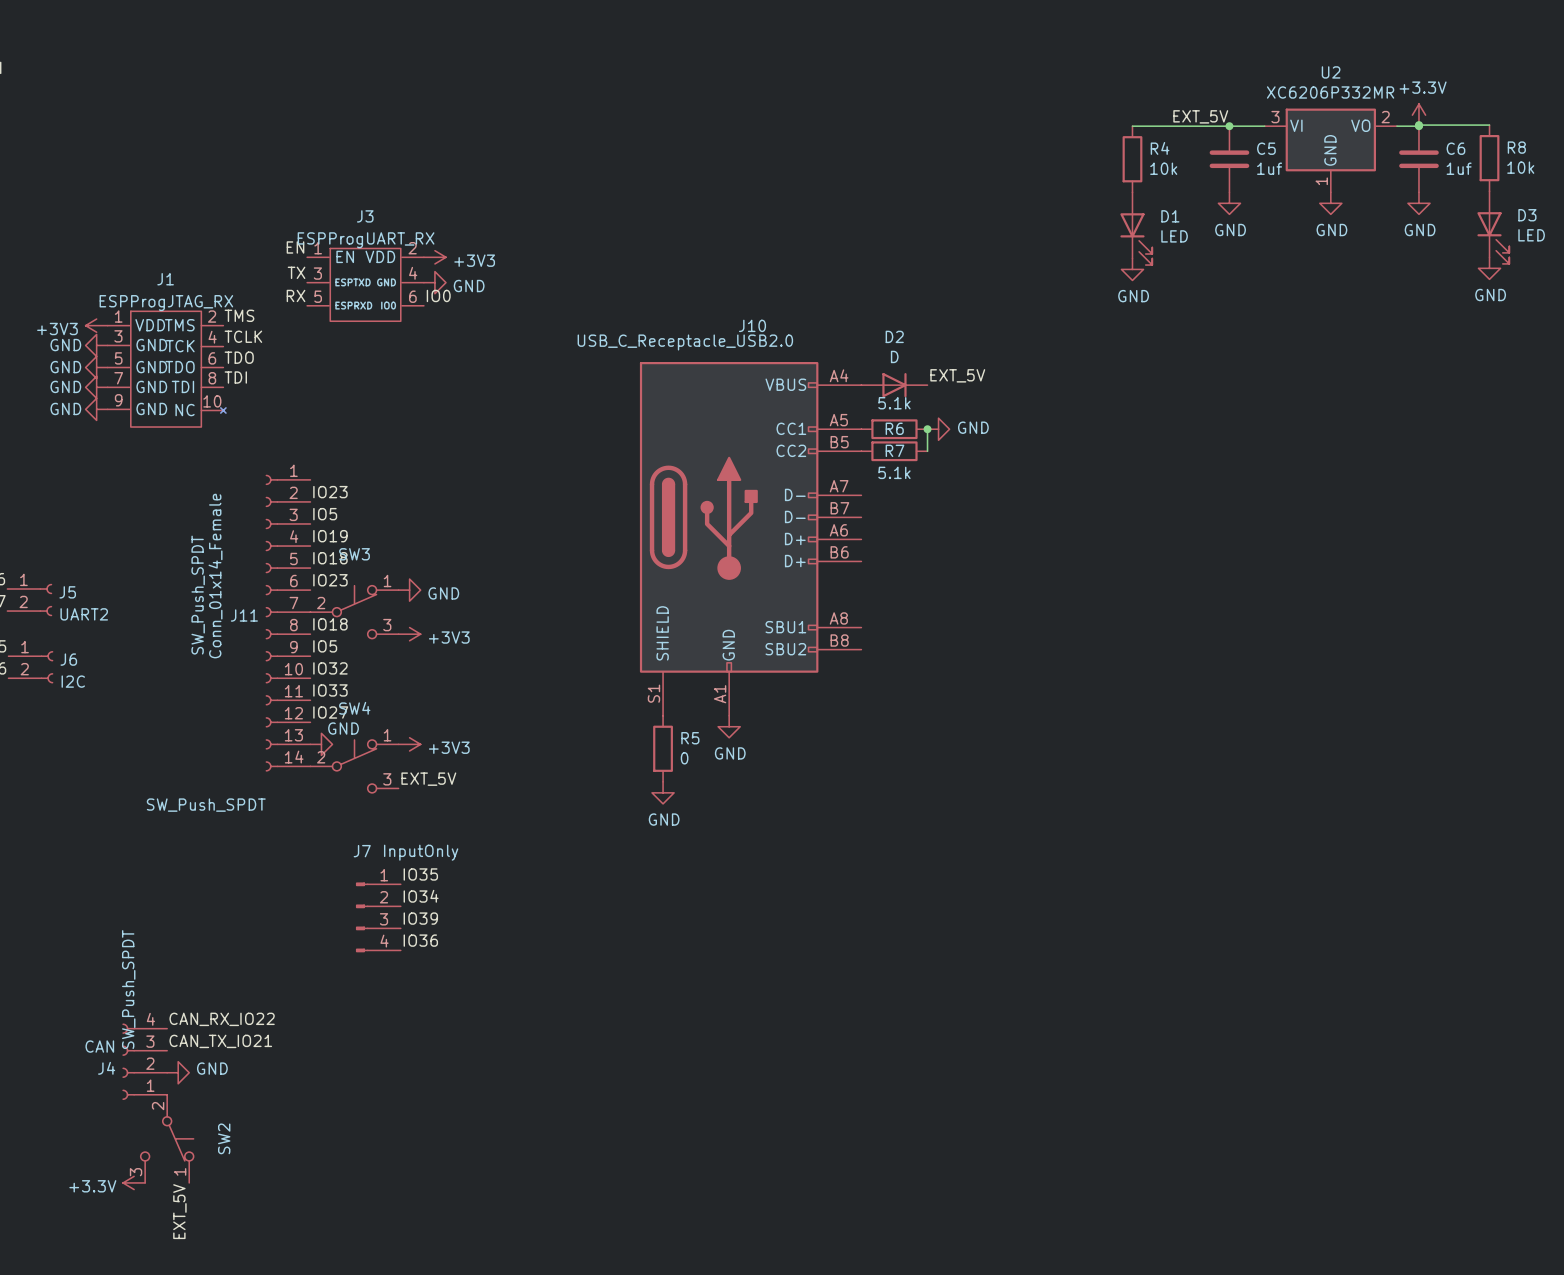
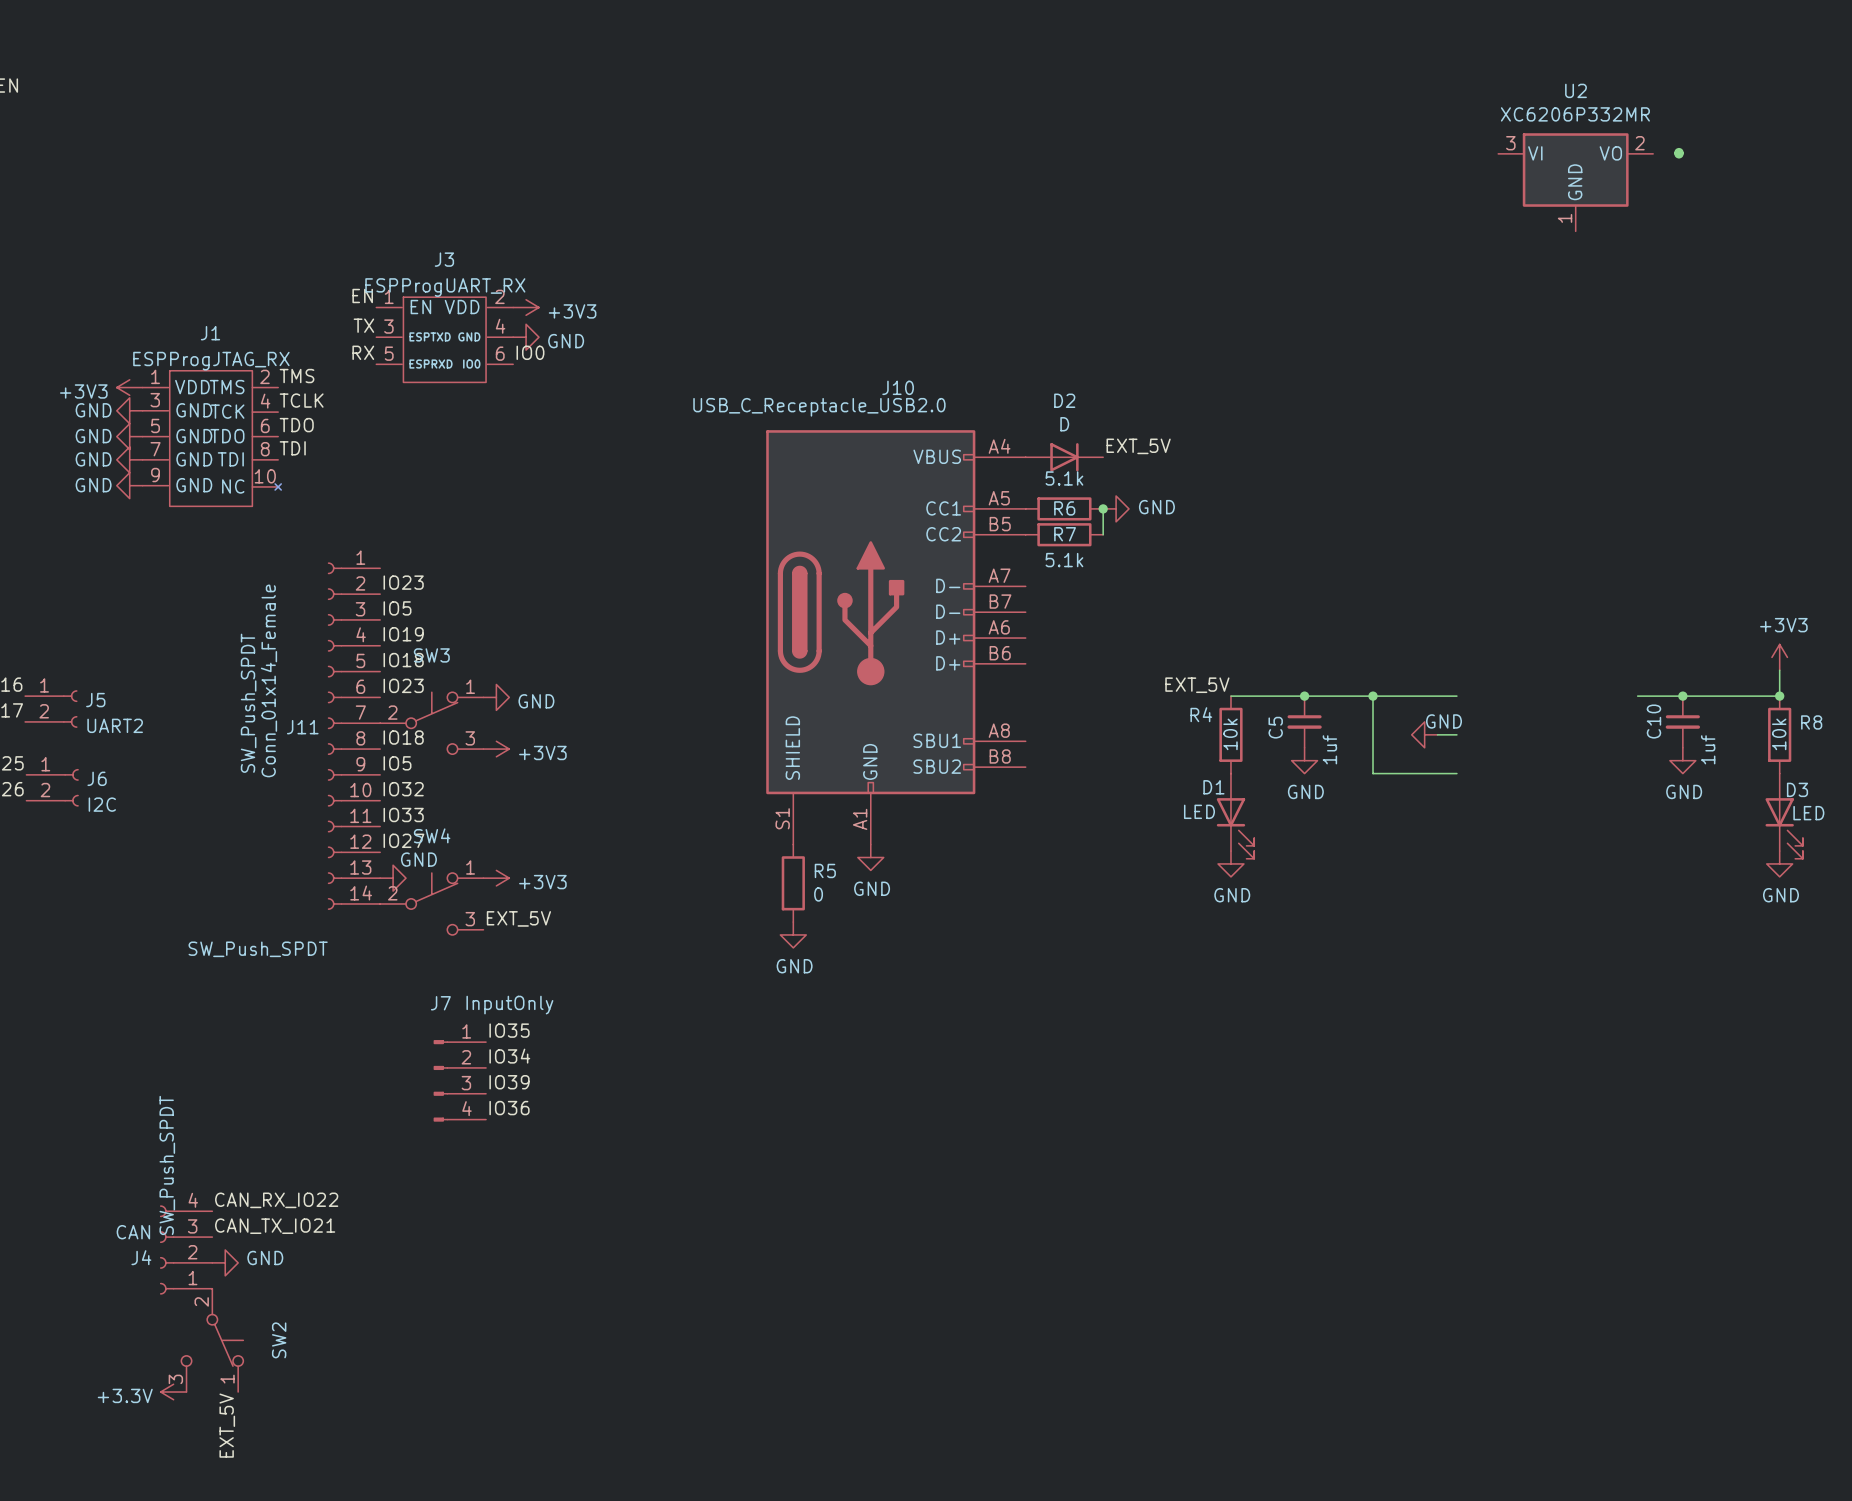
power symbol: +3.3V (1418, 115) -> none
label: EXT_5V (1200, 116) -> none
wire: (1489, 125) (1396, 126) -> none
wire: (1132, 126) (1264, 126) -> none
C5 symbol: [1209, 126, 1250, 193] -> [1287, 696, 1322, 748]
junction: (1229, 126) -> none
R4 name position: R4 (1160, 148) -> R4 (1201, 714)
C5 name position: C5 (1266, 148) -> C5 (1275, 727)
R8 position: (1489, 158) -> (1779, 734)
R4 position: (1132, 159) -> (1230, 734)
C6: 1uf (1418, 159) -> none
R8 value rotation: 0° (1520, 167) -> 90° counterclockwise (1779, 734)
R4 value rotation: 0° (1163, 168) -> 90° counterclockwise (1230, 734)
C5 value position: 1uf (1269, 168) -> 1uf (1329, 749)
power symbol: GND (1229, 203) -> none
power symbol: GND (1330, 203) -> none
power symbol: GND (1418, 203) -> none
D3 name position: D3 (1527, 215) -> D3 (1797, 789)
D1 name position: D1 (1170, 216) -> D1 (1213, 787)
D3 position: (1493, 227) -> (1784, 816)
D1 position: (1136, 228) -> (1235, 816)
D3 value position: LED (1531, 235) -> LED (1808, 813)
D1 value position: LED (1174, 236) -> LED (1199, 811)
power symbol: GND (1489, 268) -> none
power symbol: GND (1132, 269) -> none
power symbol: none -> +3V3 (1779, 657)
wire: none -> (1779, 670) (1779, 696) (1637, 696)
label: none -> EXT_5V (1197, 685)
wire: none -> (1230, 696) (1456, 696)
junction: none -> (1304, 696)
wire: none -> (1373, 696) (1373, 773) (1456, 773)
junction: none -> (1373, 696)
junction: none -> (1682, 696)
junction: none -> (1779, 696)
C10: none -> 1uf (1682, 721)
power symbol: none -> GND (1424, 734)
wire: none -> (1437, 734) (1456, 734)
power symbol: none -> GND (1304, 760)
power symbol: none -> GND (1682, 760)
power symbol: none -> GND (1230, 863)
power symbol: none -> GND (1779, 863)

